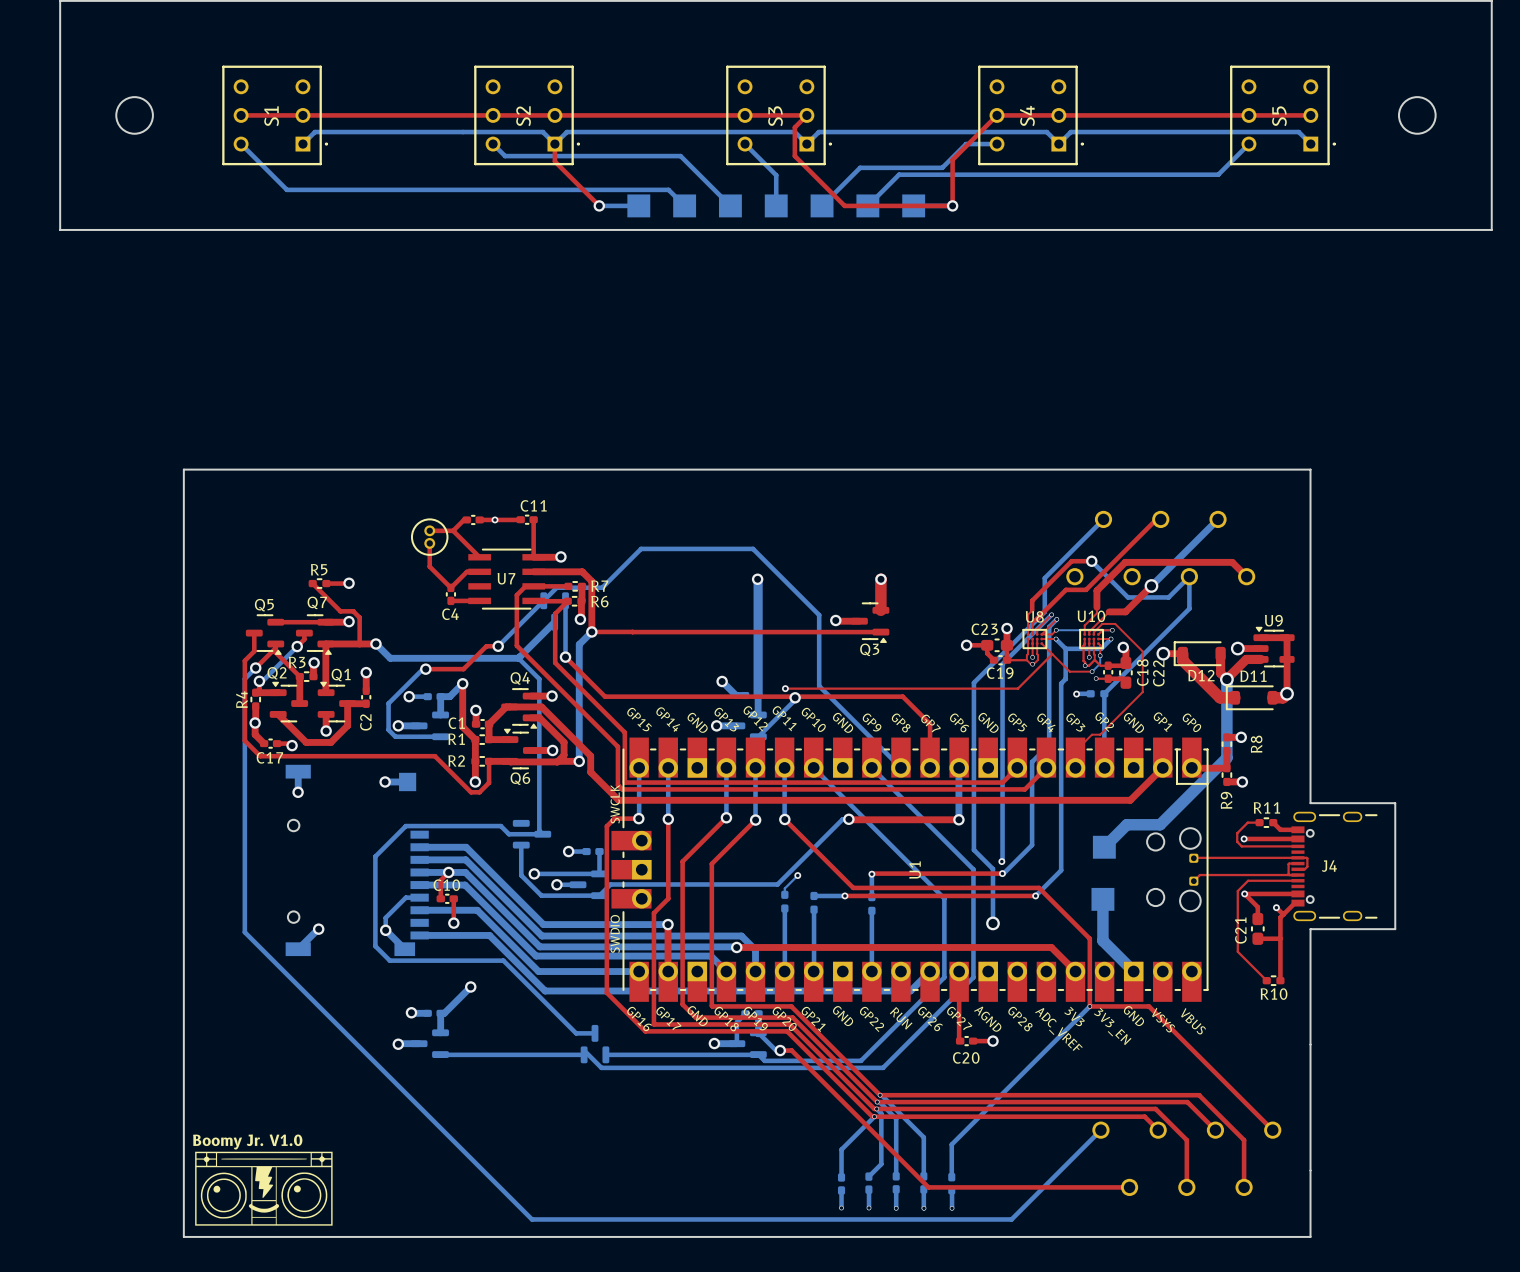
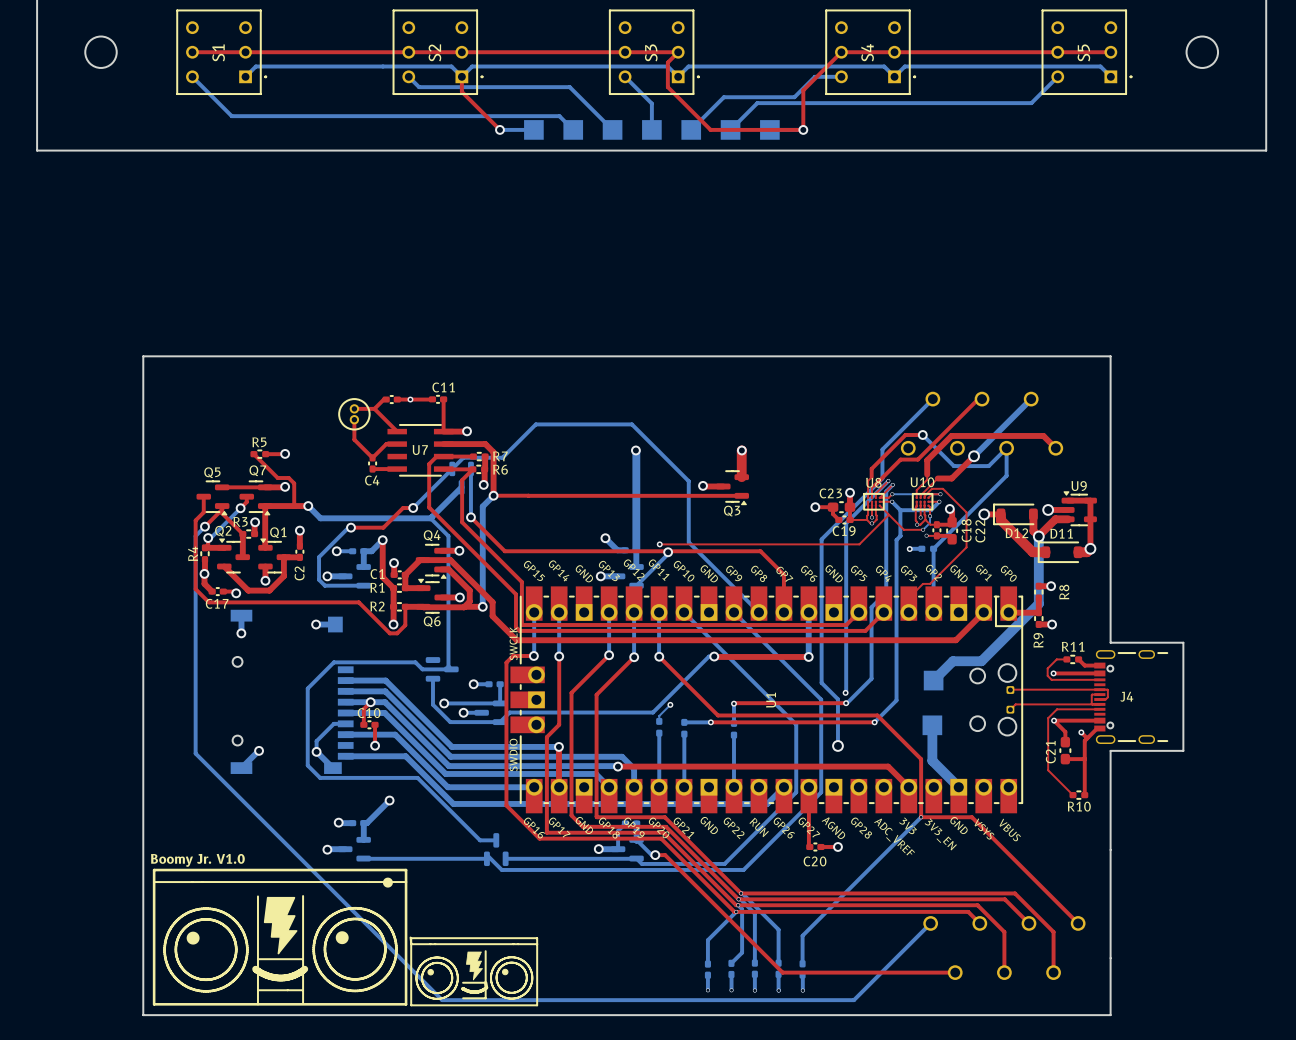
line: none -> (154, 870) (154, 1004) (406, 1004) (406, 870) (154, 870)
drawing: none -> [382, 877, 393, 888]
line: none -> (154, 882) (406, 882)
line: none -> (257, 896) (257, 1004)
line: none -> (303, 896) (303, 1004)
drawing: none -> [263, 896, 298, 955]
line: none -> (205, 908) (189, 911) (176, 920) (167, 933) (164, 949) (167, 966) (176, 979) (189, 988) (205, 991) (222, 988) (235, 979) (244, 966) (247, 949) (244, 933) (235, 920) (222, 911) (205, 908)
line: none -> (355, 908) (338, 911) (325, 920) (316, 933) (313, 949) (316, 965) (325, 978) (338, 987) (355, 990) (371, 987) (384, 978) (393, 965) (396, 949) (393, 933) (384, 920) (371, 911) (355, 908)
line: none -> (355, 918) (343, 921) (333, 927) (327, 937) (324, 949) (327, 960) (333, 970) (343, 976) (355, 979) (366, 976) (376, 970) (382, 960) (385, 949) (382, 937) (376, 927) (366, 921) (355, 918)
line: none -> (204, 919) (192, 922) (183, 929) (177, 939) (175, 951) (178, 962) (185, 971) (195, 977) (207, 979) (219, 976) (228, 969) (234, 959) (236, 948) (233, 936) (226, 927) (216, 921) (204, 919)
drawing: none -> [186, 931, 200, 945]
drawing: none -> [335, 931, 349, 945]
text position: Boomy Jr. V1.0 (247, 1142) -> Boomy Jr. V1.0 (197, 860)
line: none -> (410, 937) (411, 944) (537, 944)
line: none -> (411, 938) (411, 1005) (537, 1005) (537, 938) (411, 938)
drawing: [195, 1151, 333, 1226] -> none
drawing: none -> [466, 951, 483, 981]
line: none -> (485, 951) (485, 998) (463, 998)
line: none -> (436, 957) (428, 959) (421, 964) (417, 971) (416, 979) (418, 987) (423, 993) (430, 997) (438, 998) (446, 996) (452, 992) (456, 985) (457, 977) (455, 969) (451, 962) (444, 958) (436, 957)
line: none -> (510, 957) (502, 959) (496, 964) (492, 970) (491, 979) (493, 986) (497, 993) (504, 997) (512, 998) (520, 996) (526, 991) (531, 985) (532, 976) (530, 968) (525, 962) (518, 958) (510, 957)
line: none -> (257, 959) (303, 959)
line: none -> (510, 962) (500, 968) (496, 979) (502, 989) (513, 992) (523, 987) (526, 976) (521, 966) (510, 962)
line: none -> (436, 962) (425, 967) (422, 978) (427, 989) (437, 993) (448, 988) (452, 977) (447, 966) (436, 962)
drawing: none -> [502, 968, 509, 976]
line: none -> (255, 969) (267, 975) (280, 978) (293, 975) (304, 969)
drawing: none -> [427, 968, 434, 976]
line: none -> (463, 982) (485, 982) (486, 987) (480, 991) (472, 992) (463, 988) (465, 989)
line: none -> (257, 990) (303, 990)

